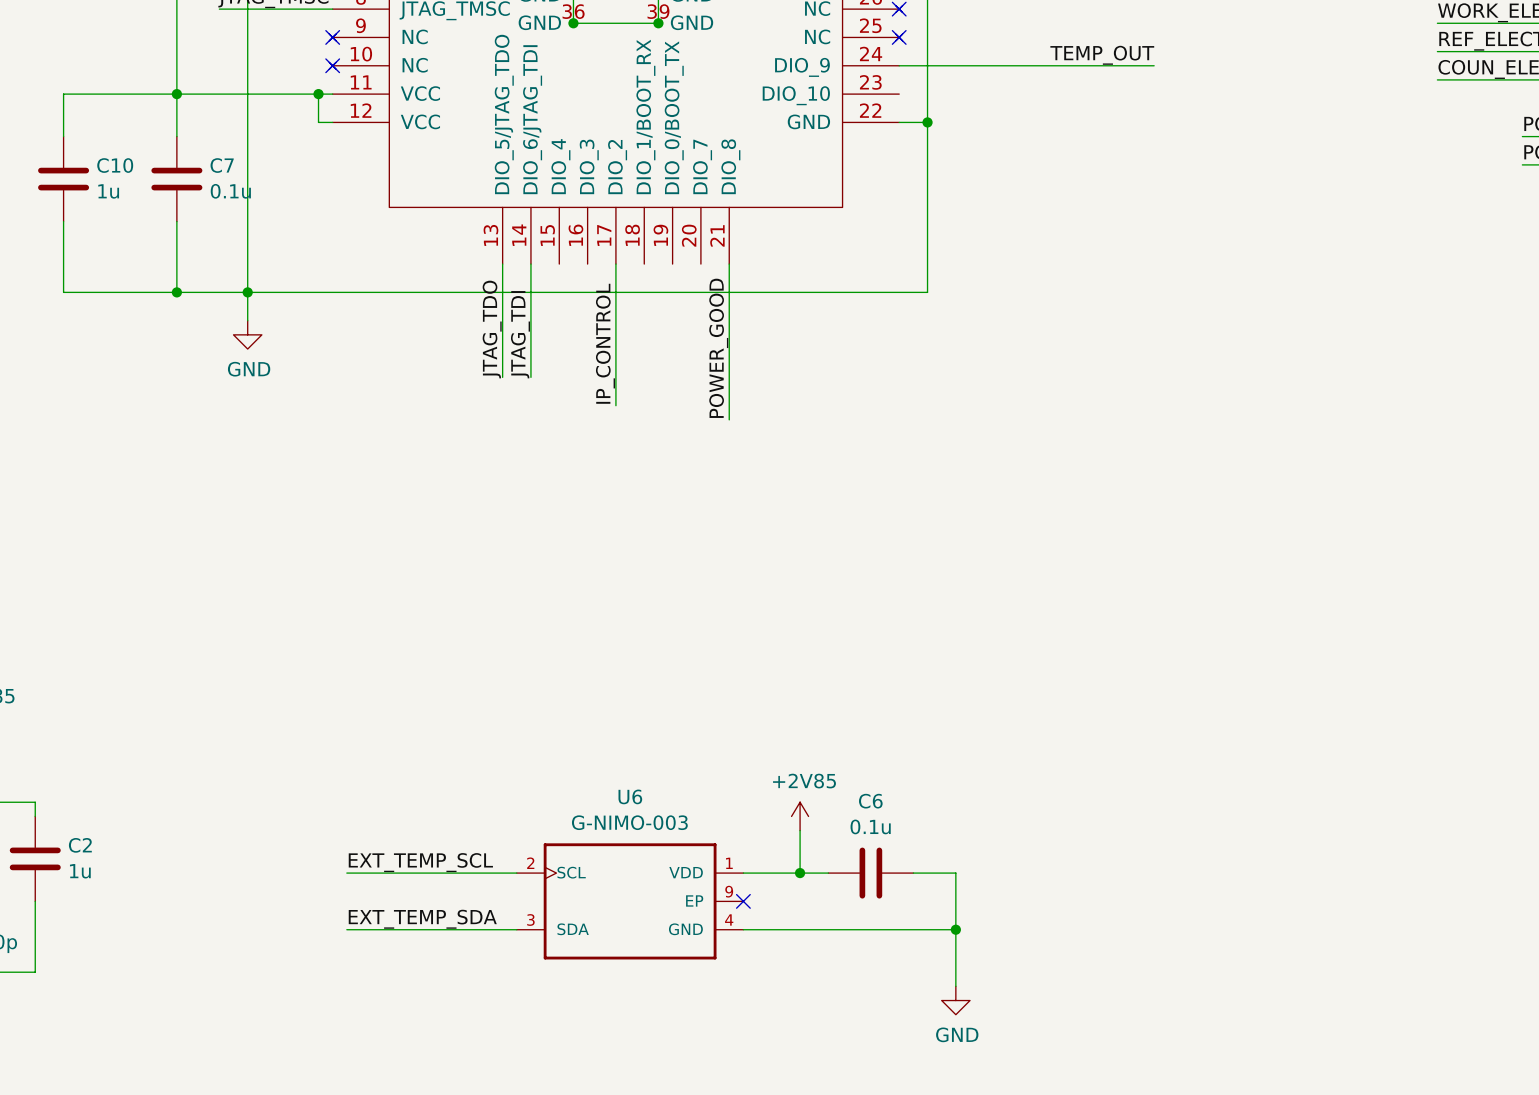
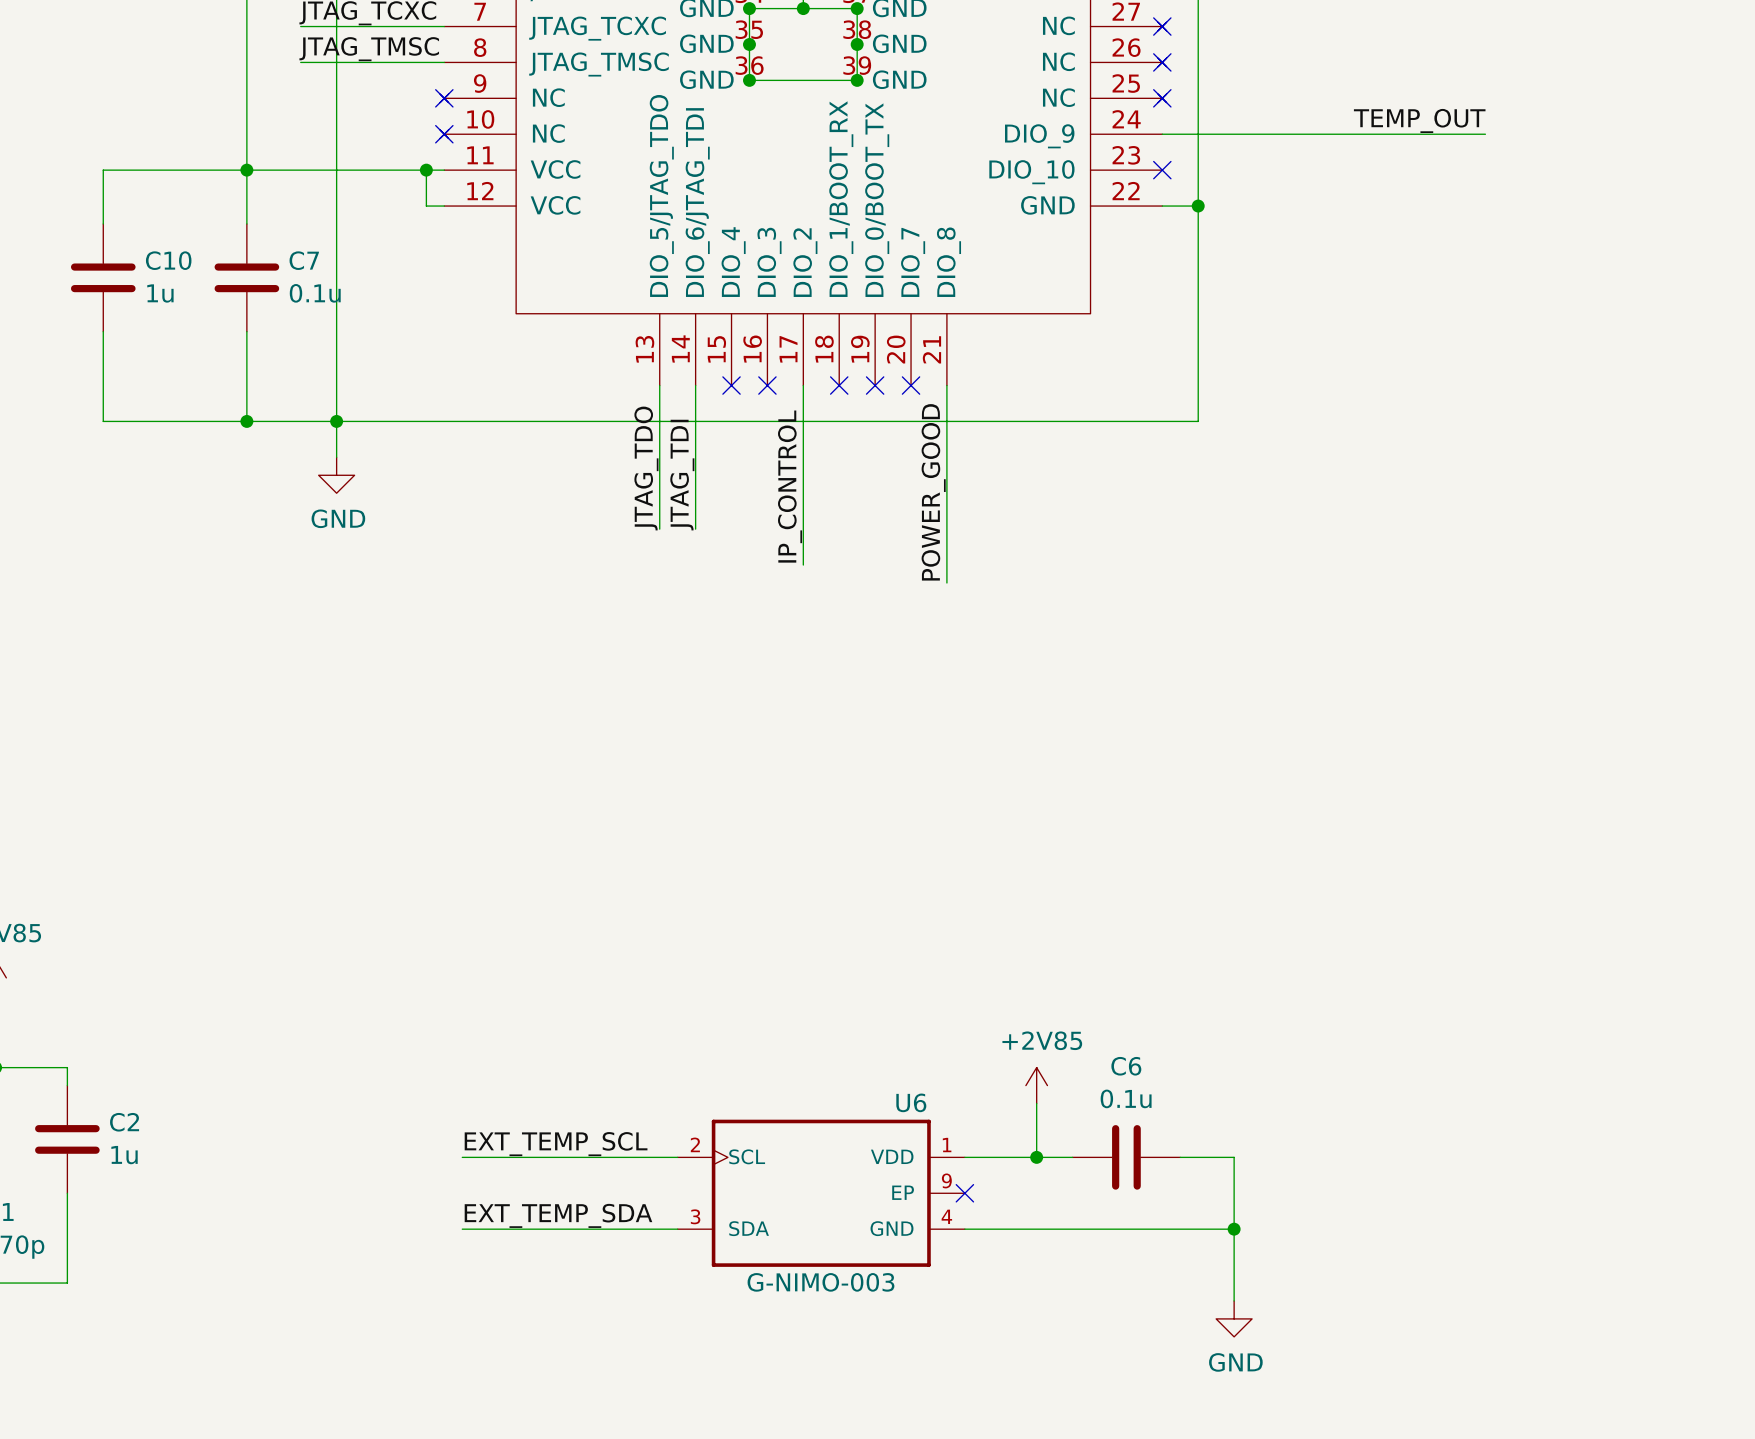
no-connect mark: none -> (1162, 170)
no-connect mark: none -> (731, 385)
no-connect mark: none -> (767, 385)
no-connect mark: none -> (839, 385)
no-connect mark: none -> (875, 385)
no-connect mark: none -> (911, 385)
U6 name position: U6 (630, 796) -> U6 (911, 1102)
U6 value position: G-NIMO-003 (629, 822) -> G-NIMO-003 (820, 1282)

